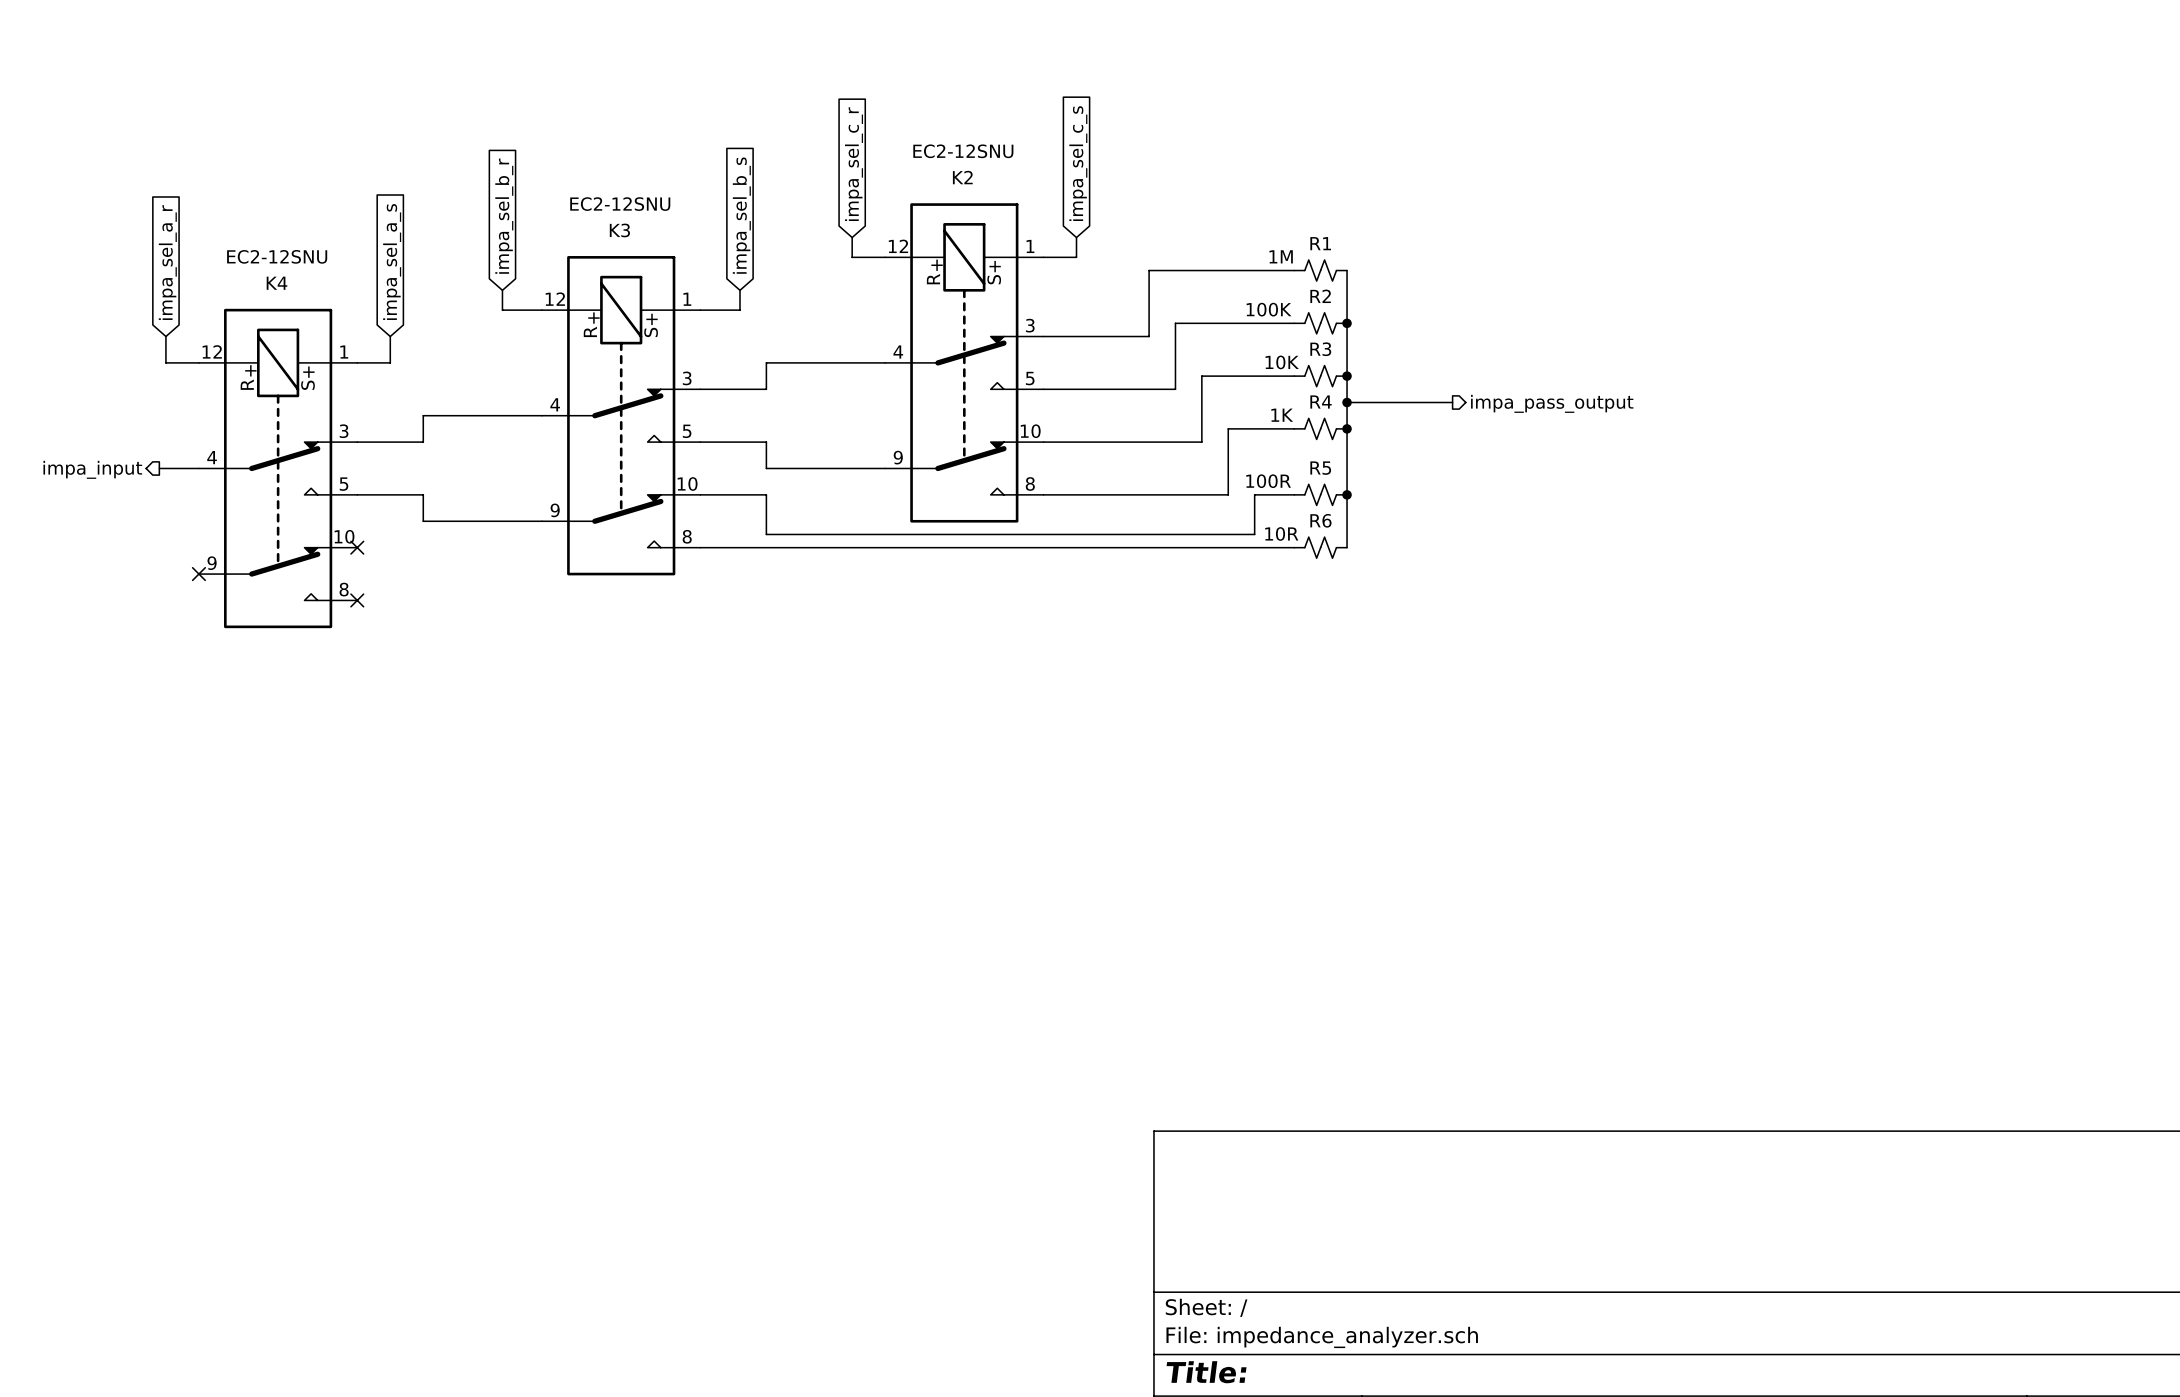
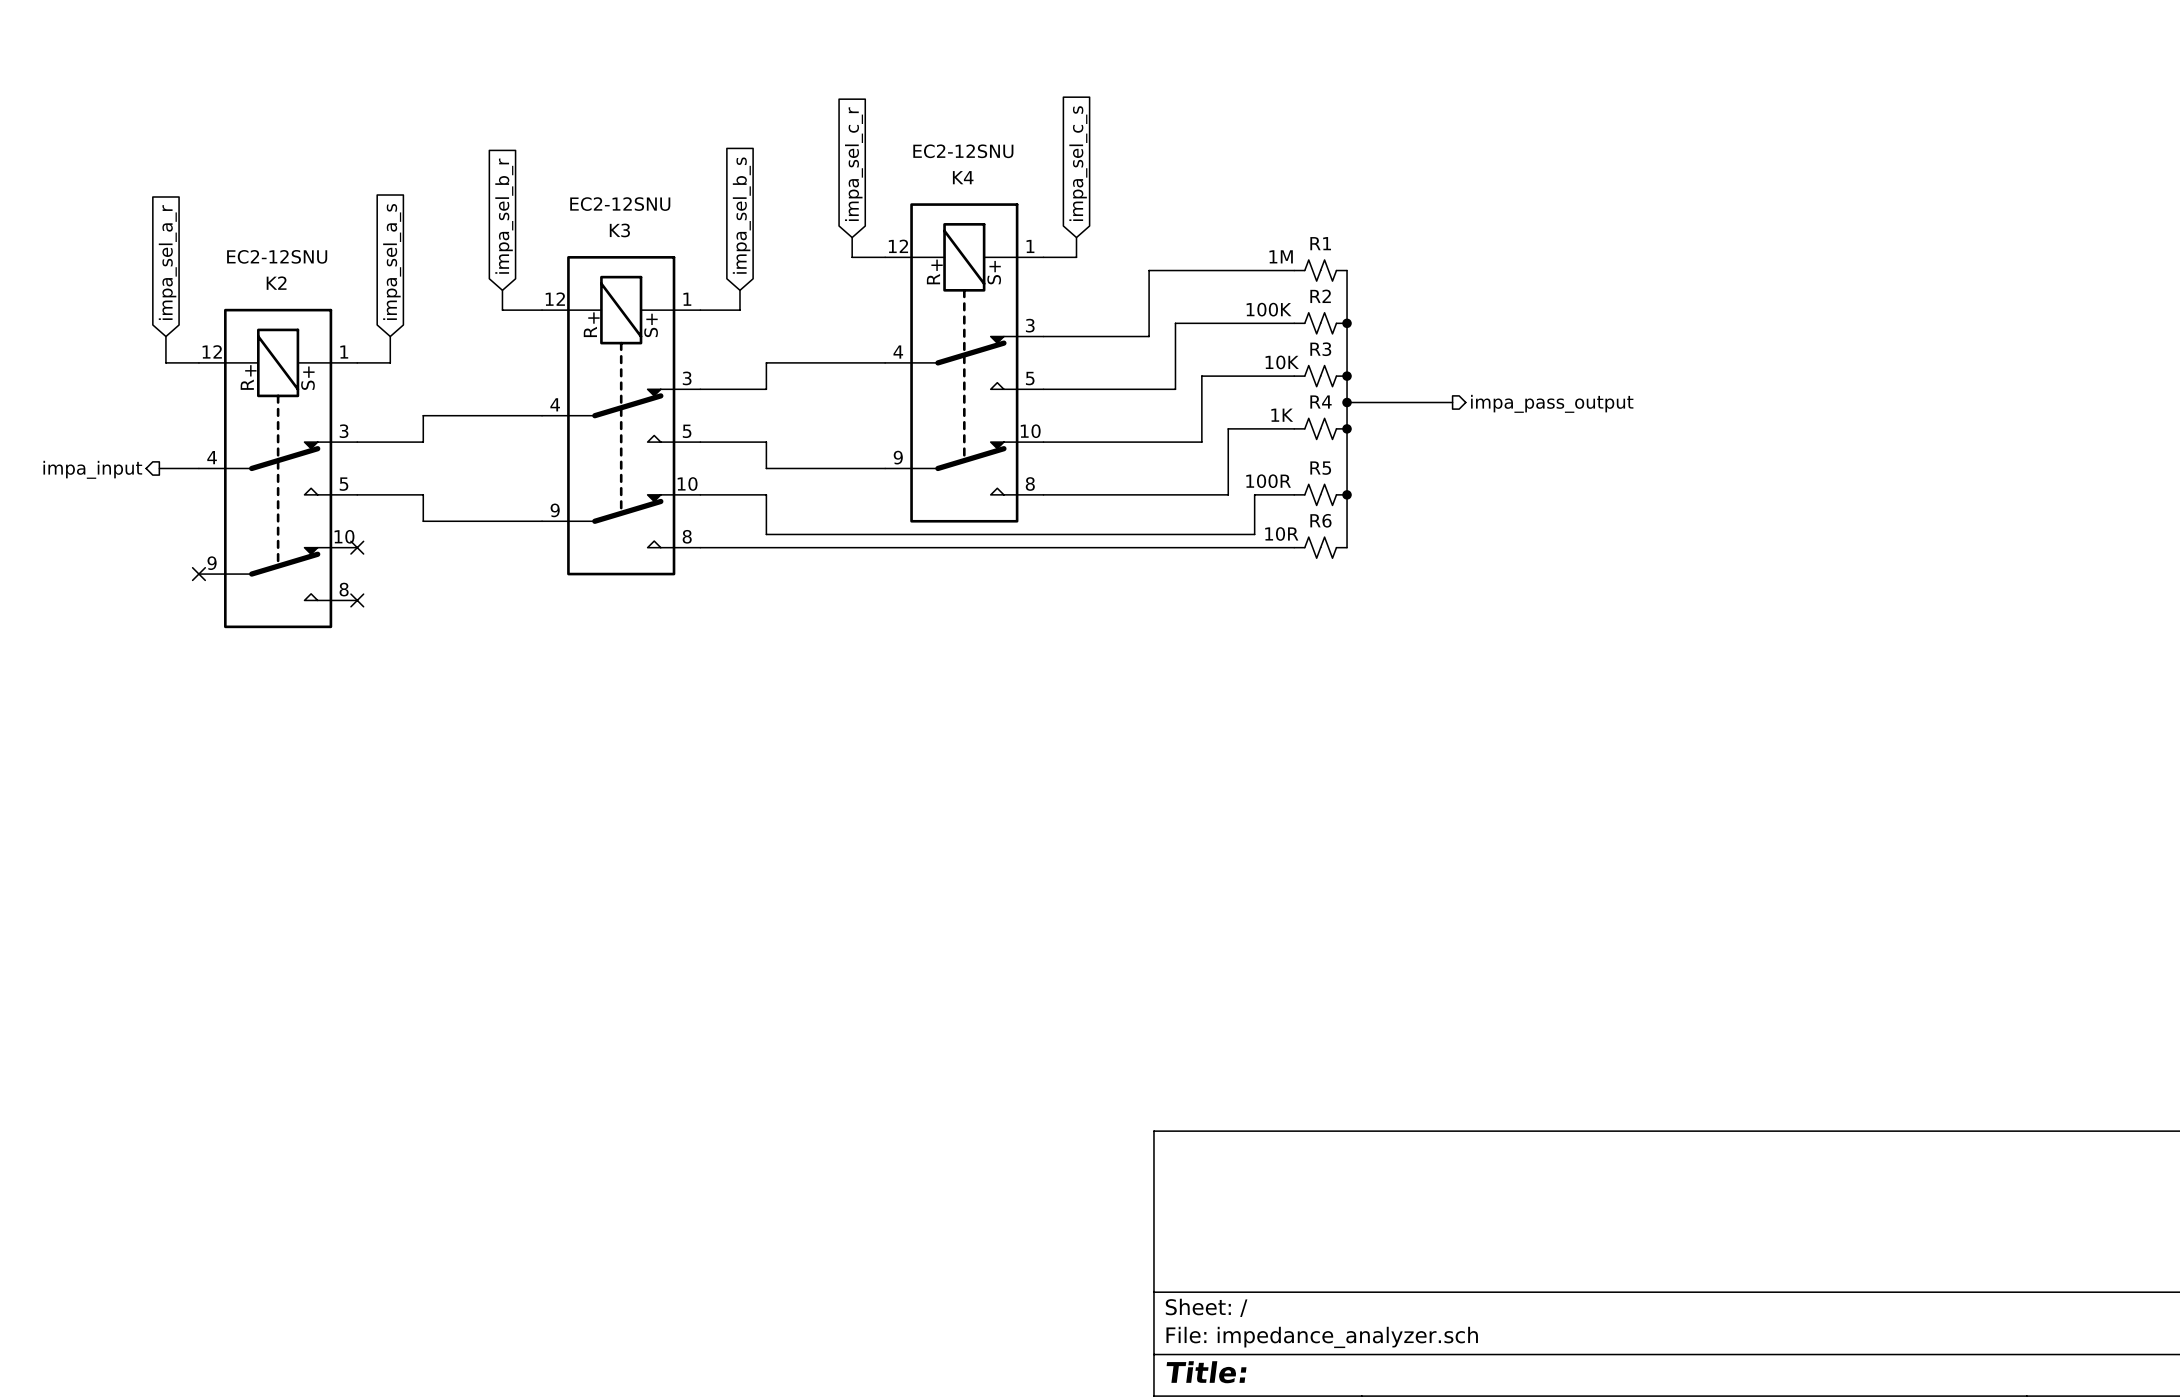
K2 name: K2 (962, 177) -> K4 (963, 177)
K4 name: K4 (277, 283) -> K2 (276, 283)

